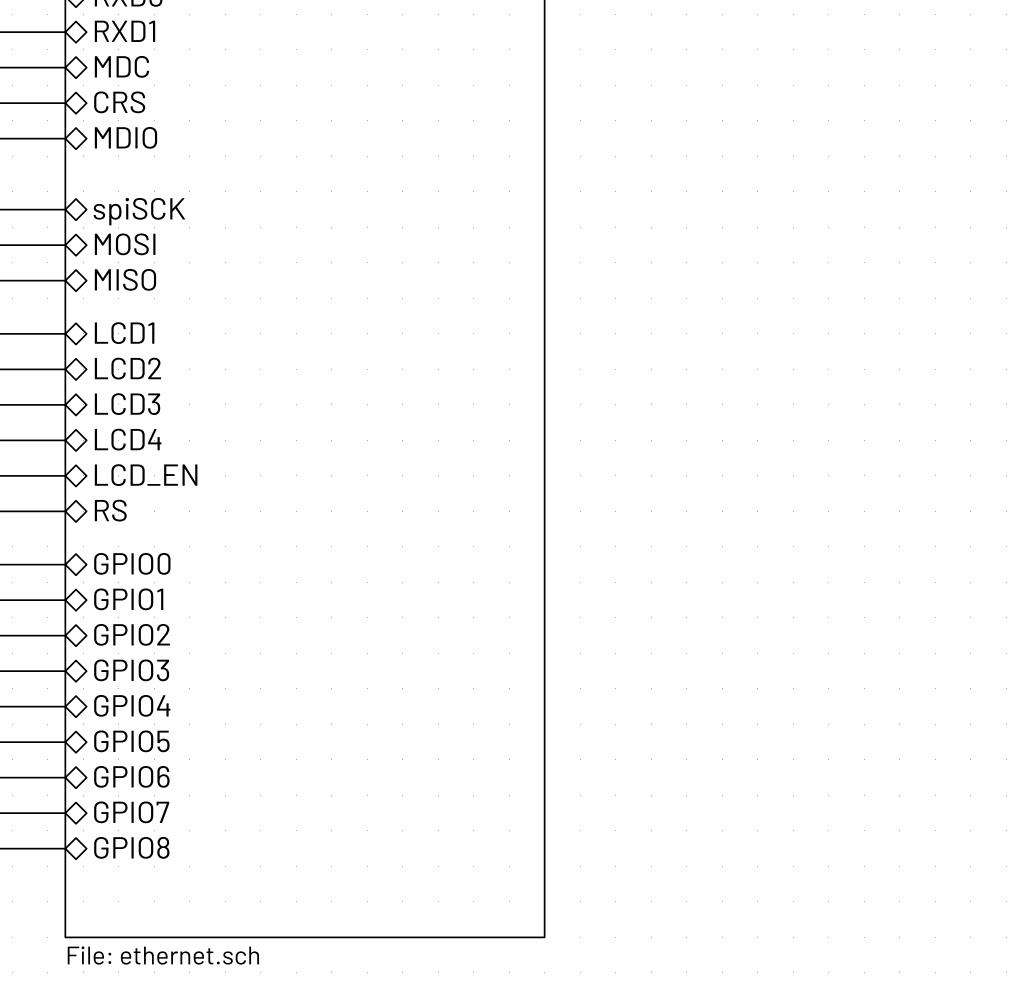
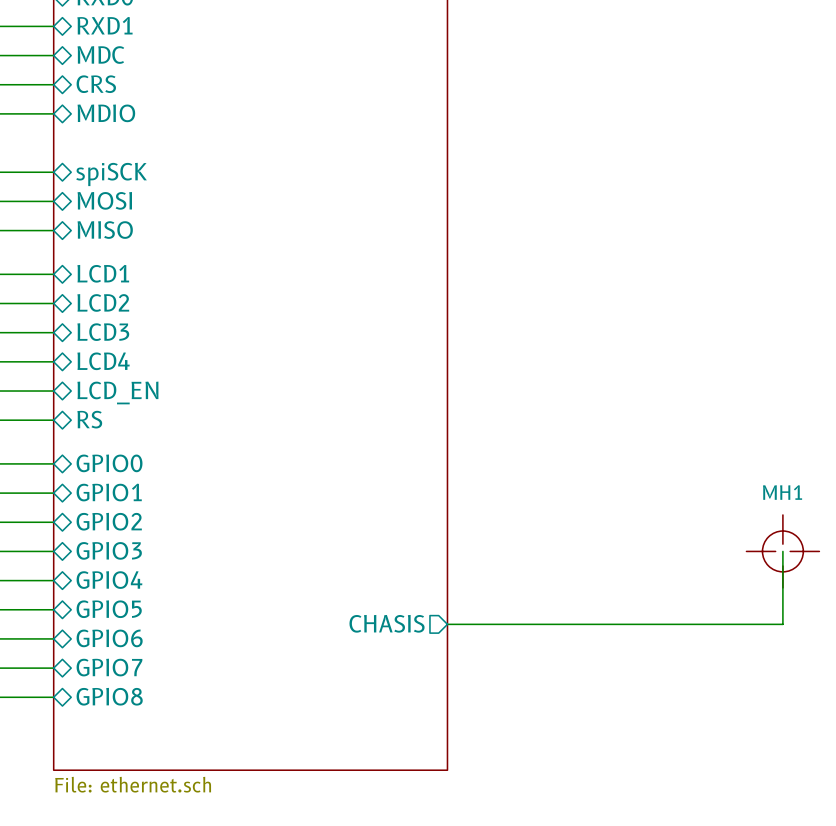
wire: none -> (782, 551) (782, 624) (447, 624)
MH1: none -> (782, 551)
sheet pin: none -> CHASIS (387, 623)

